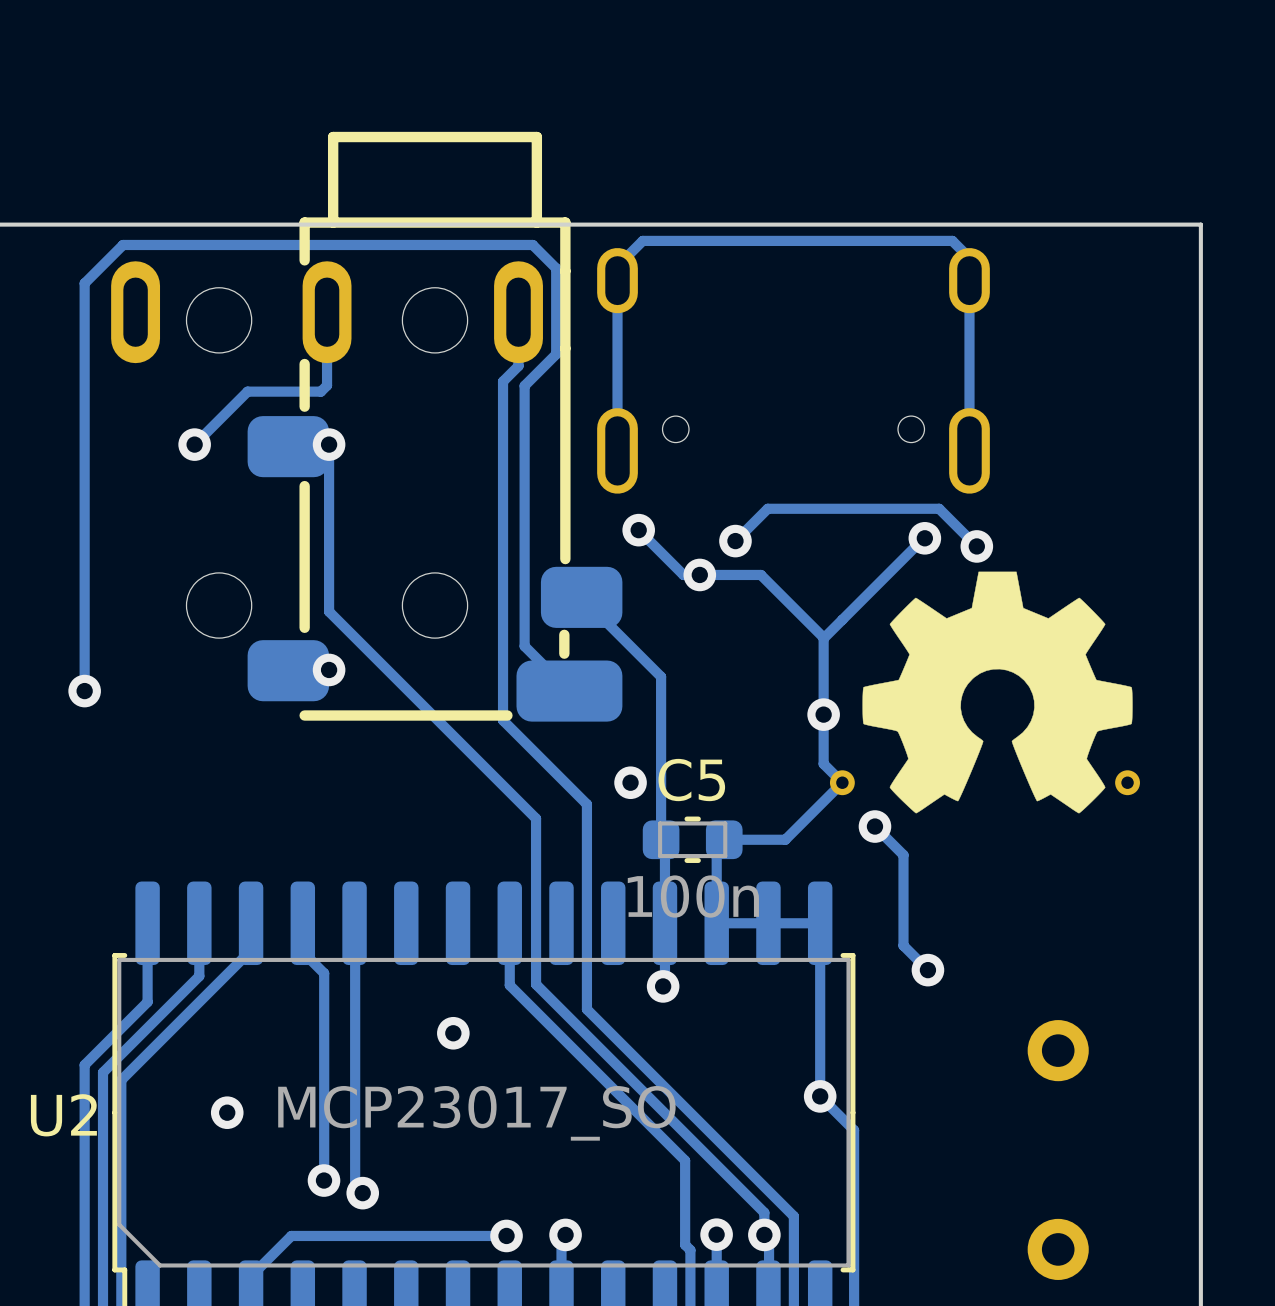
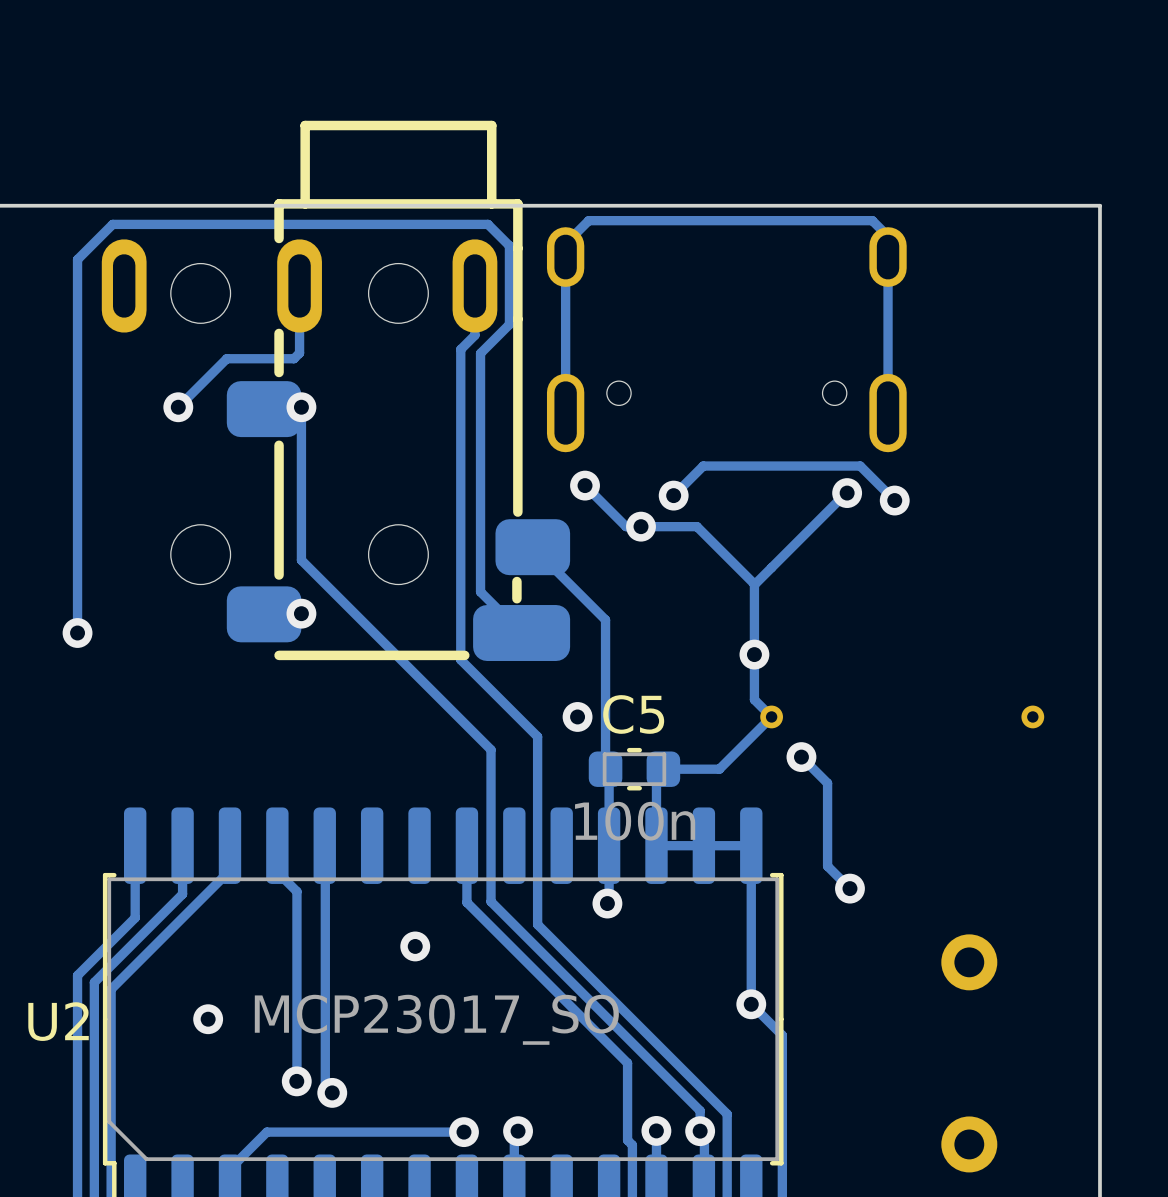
drawing: [862, 571, 1133, 814] -> none

